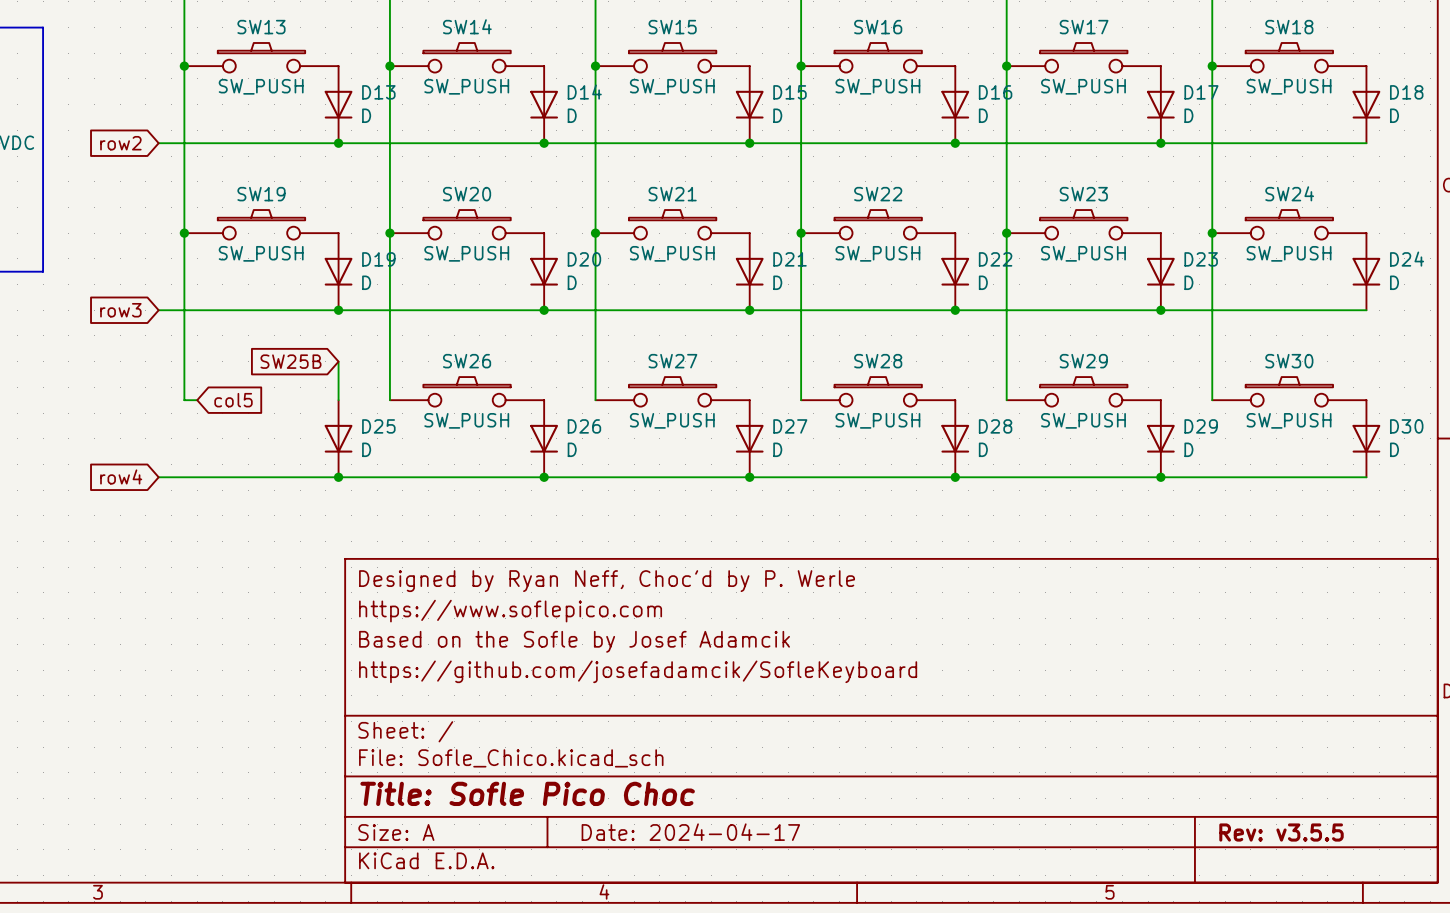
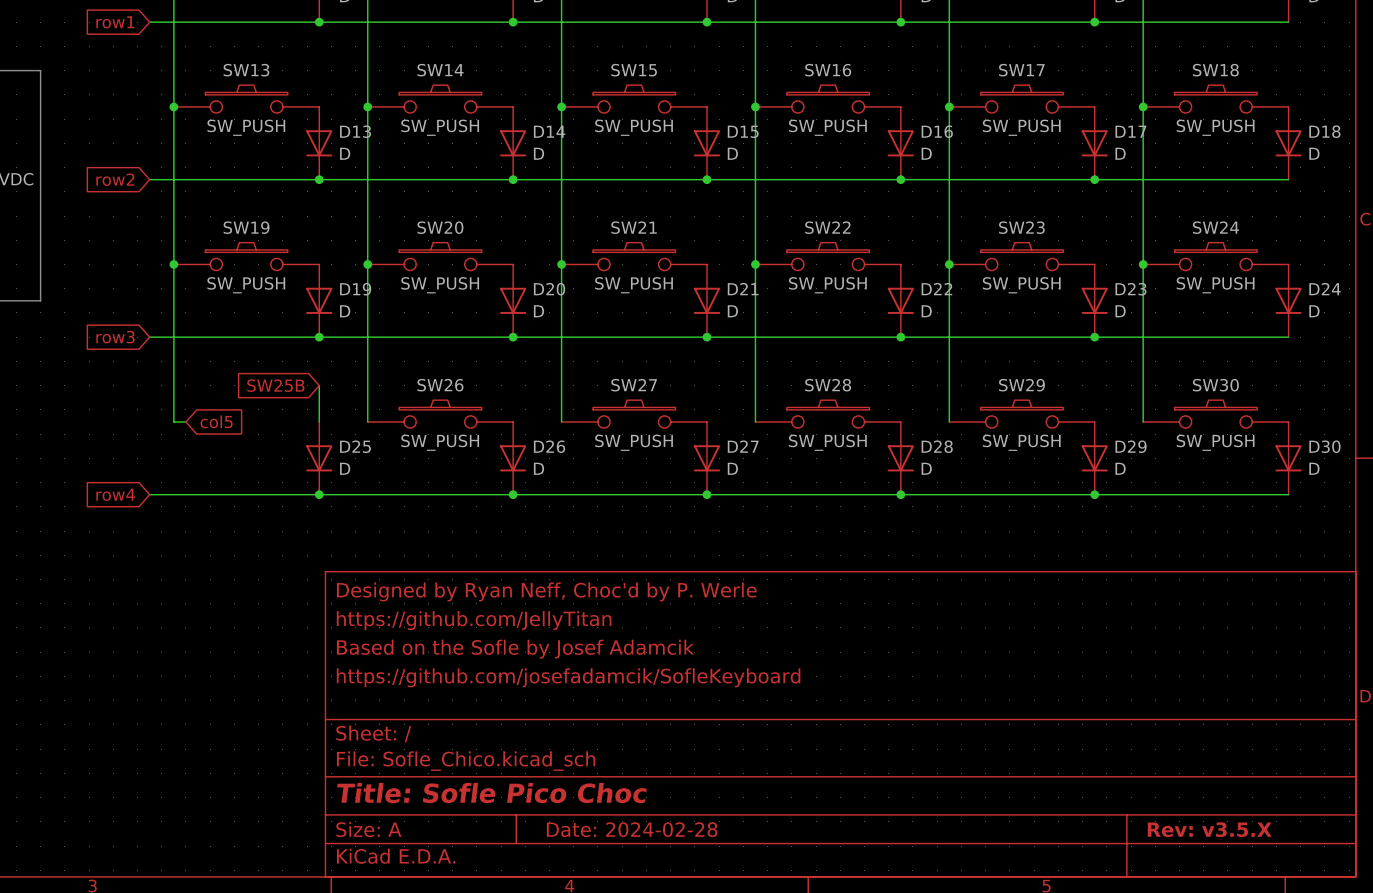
title block: https://www.soflepico.com (510, 611) -> https://github.com/JellyTitan (474, 620)
title block: Date: 2024-04-17 (690, 832) -> Date: 2024-02-28 (632, 829)
title block: Rev: v3.5.5 (1281, 832) -> Rev: v3.5.X (1209, 829)

